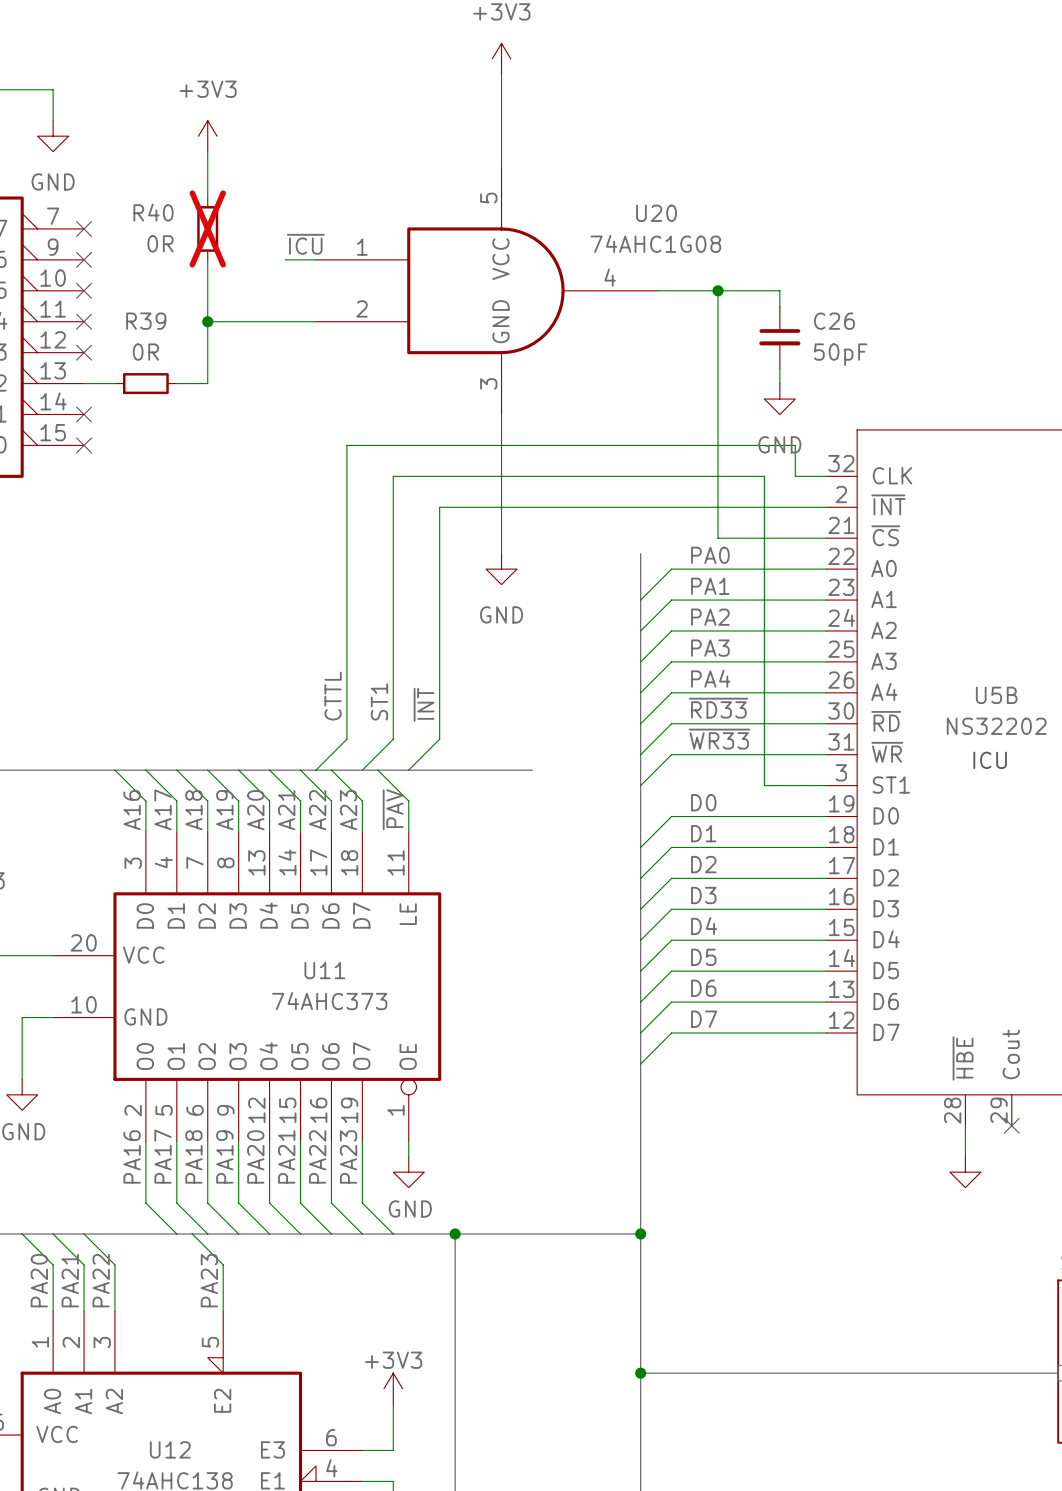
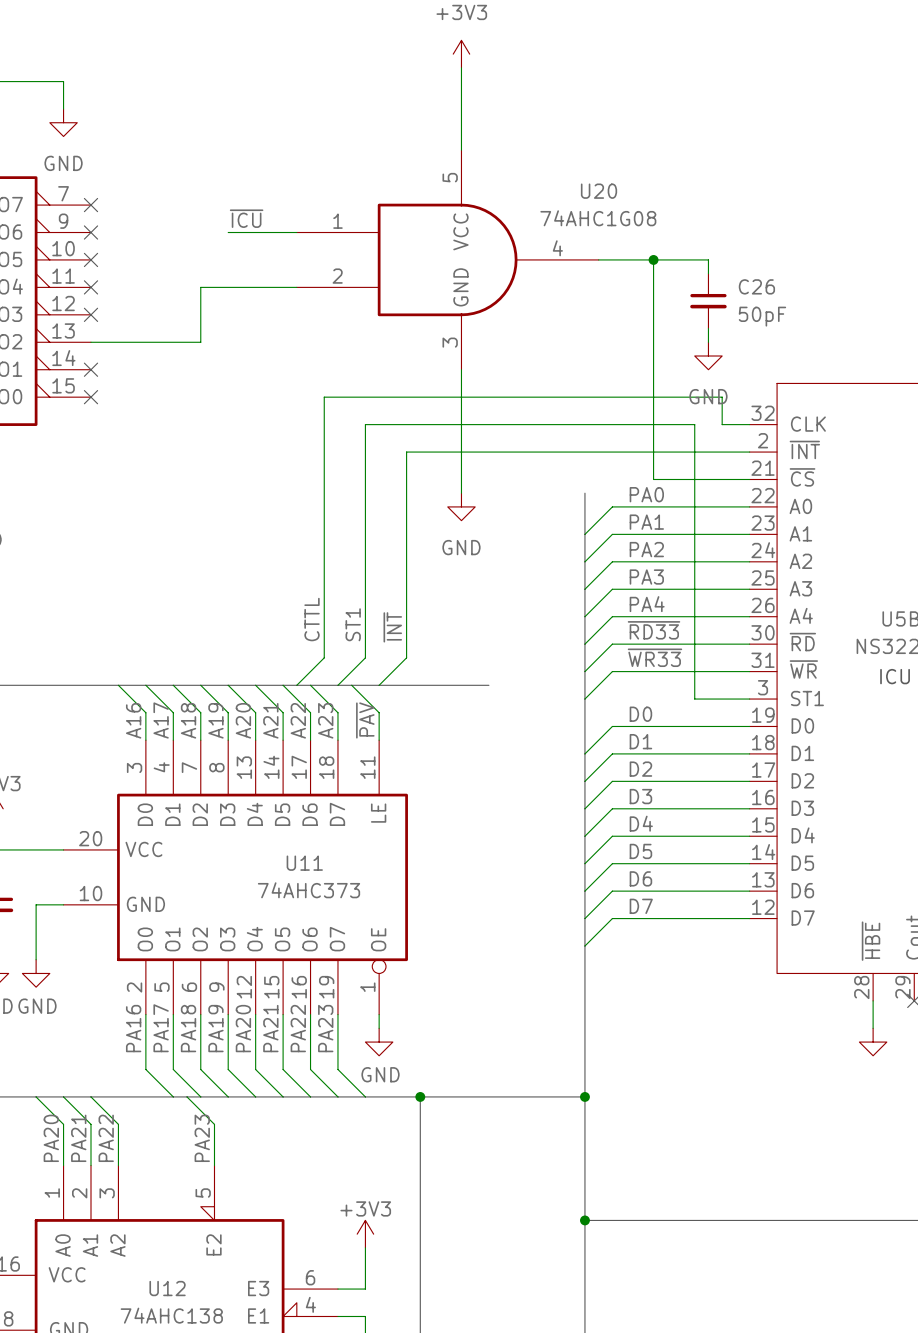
power symbol: +3V3 (207, 136) -> none
wire: (207, 151) (207, 198) -> none
R40: 0R (207, 228) -> none
label position: ~{ICU} (305, 244) -> ~{ICU} (246, 218)
wire: (207, 259) (207, 321) -> none
wire: none -> (228, 232) (269, 232)
junction: (207, 321) -> none
wire: none -> (118, 342) (173, 342)
R39: 0R (145, 383) -> none

